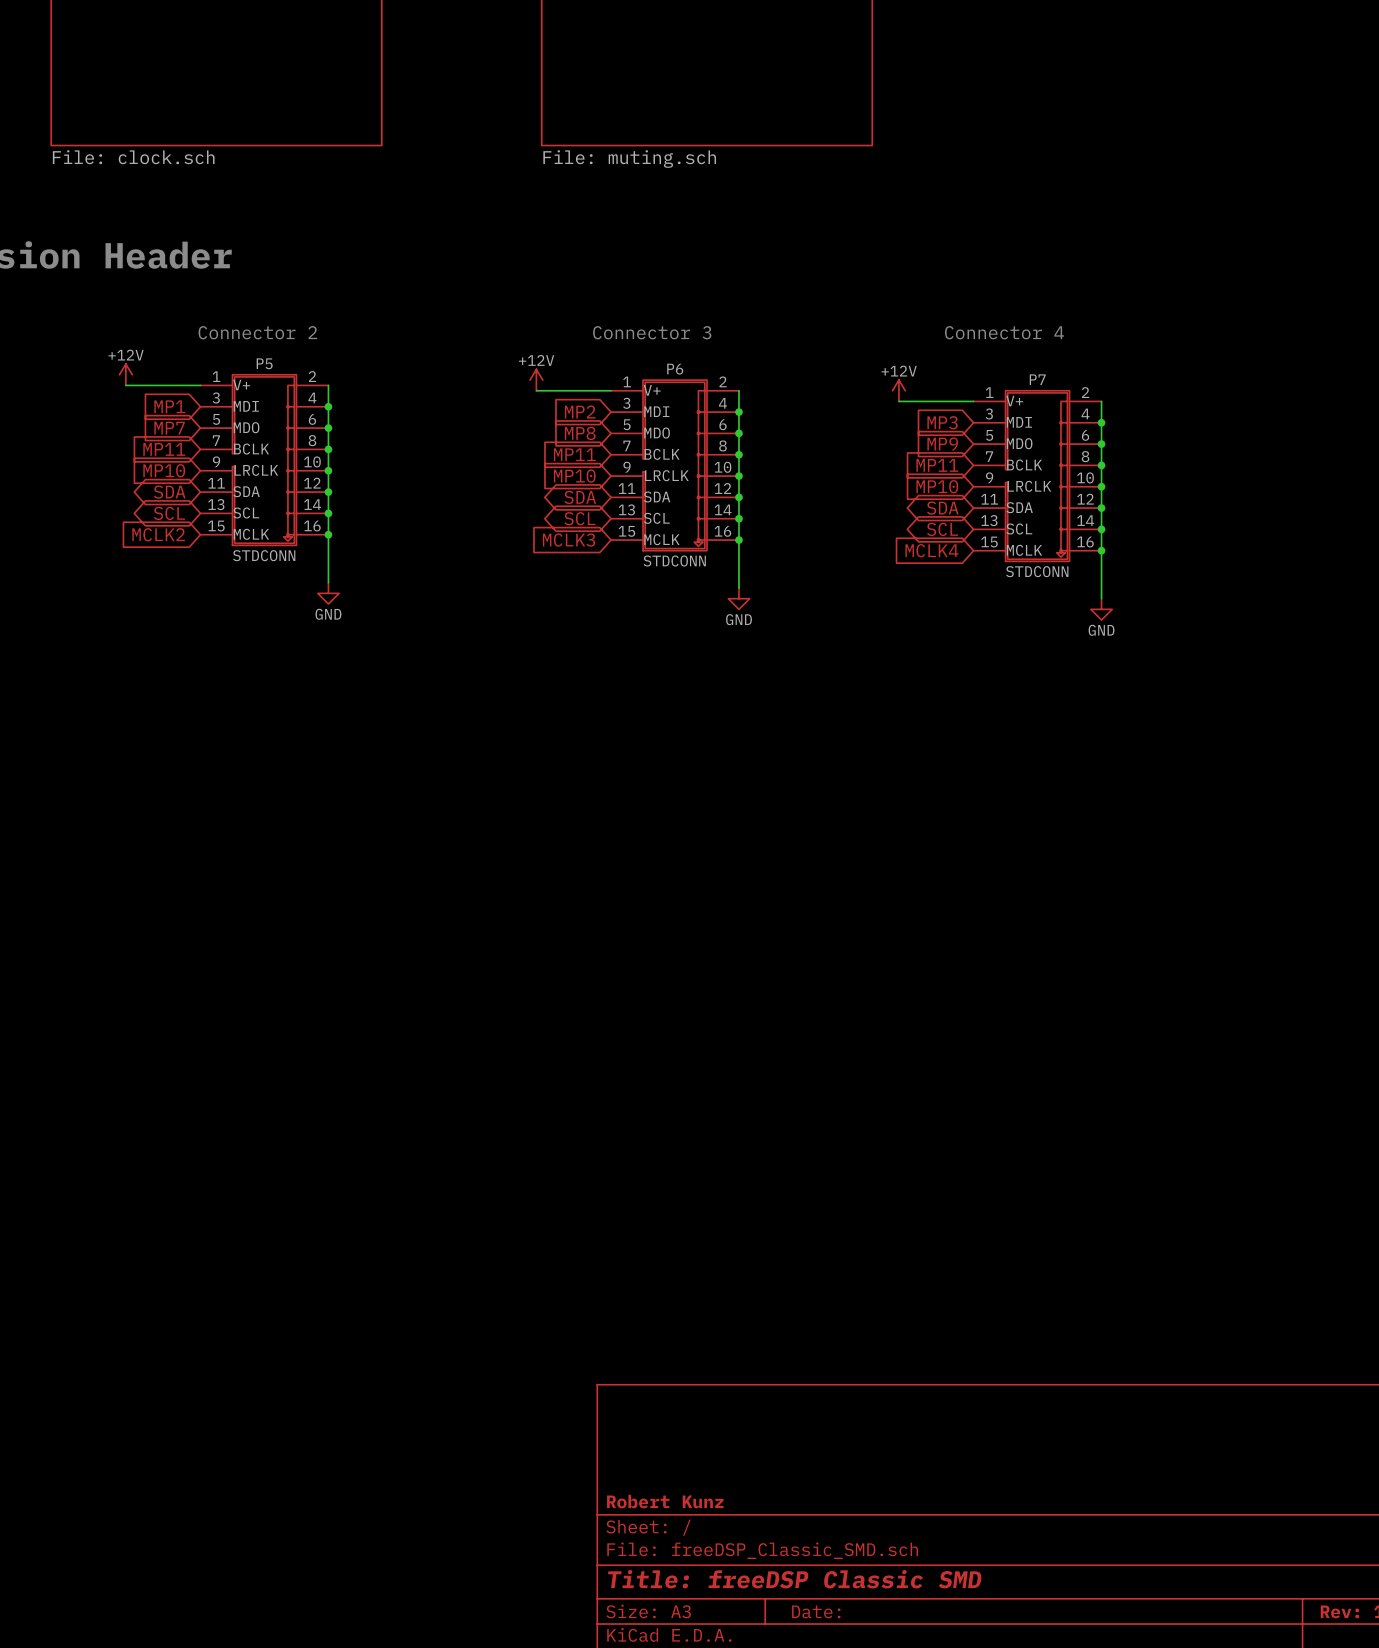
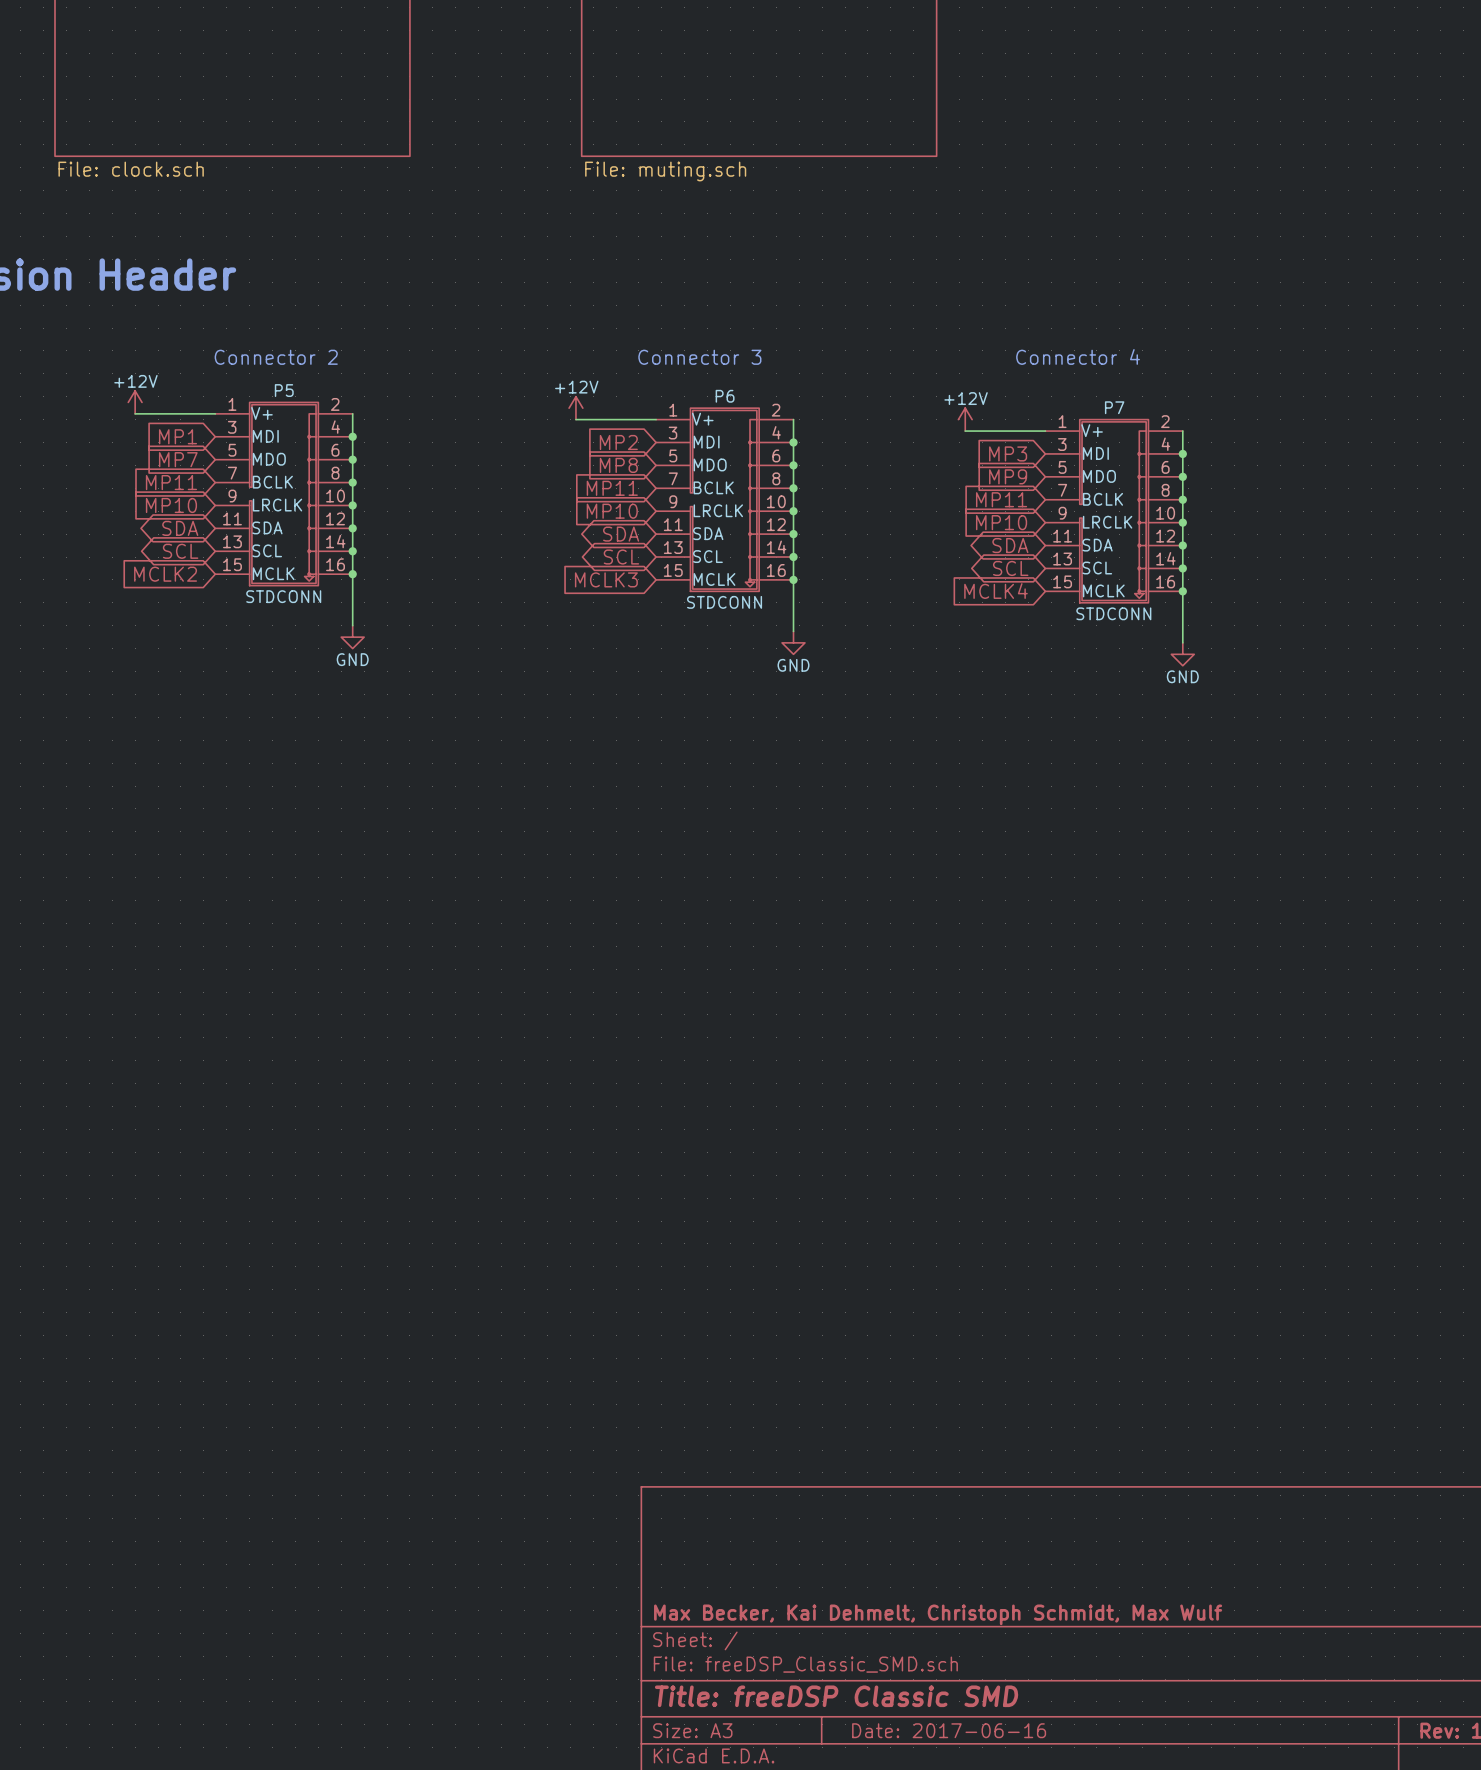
title block: Robert Kunz (665, 1501) -> Max Becker, Kai Dehmelt, Christoph Schmidt, Max Wulf (938, 1614)
title block: Date: (816, 1611) -> Date: 2017-06-16 (949, 1730)

